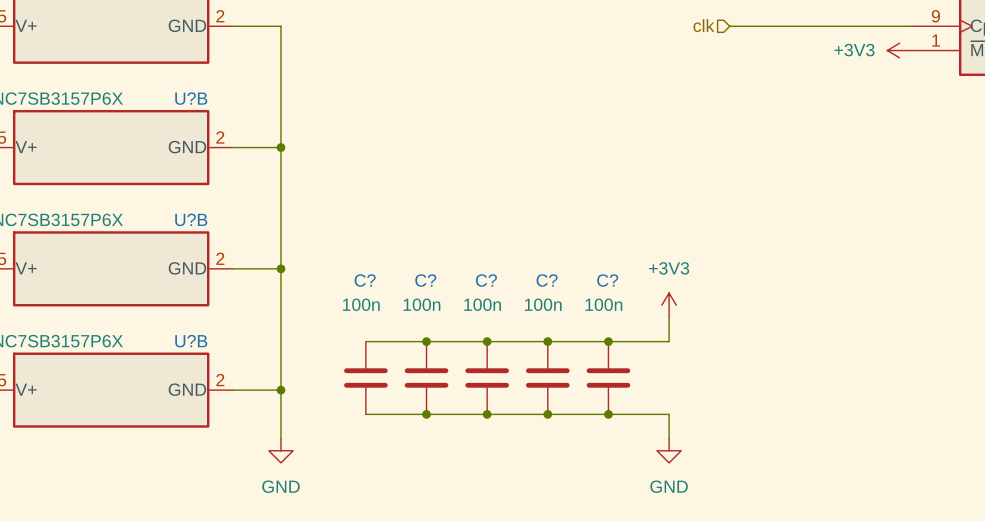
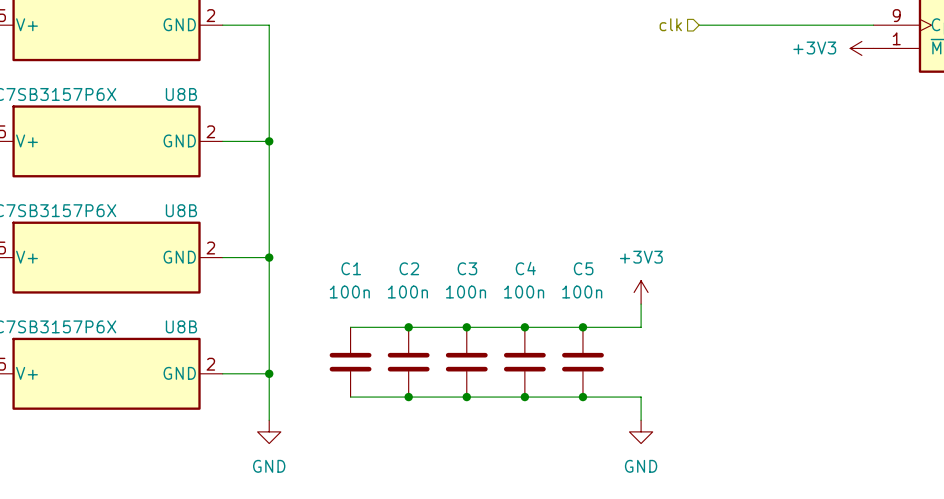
U?B name: U?B (191, 98) -> U8B (181, 94)
U?B name: U?B (191, 219) -> U8B (181, 210)
C? name: C? (365, 280) -> C1 (351, 268)
C? name: C? (425, 280) -> C2 (409, 268)
C? name: C? (486, 280) -> C3 (467, 268)
C? name: C? (547, 280) -> C4 (525, 268)
C? name: C? (607, 280) -> C5 (583, 268)
U?B name: U?B (191, 341) -> U8B (181, 326)

